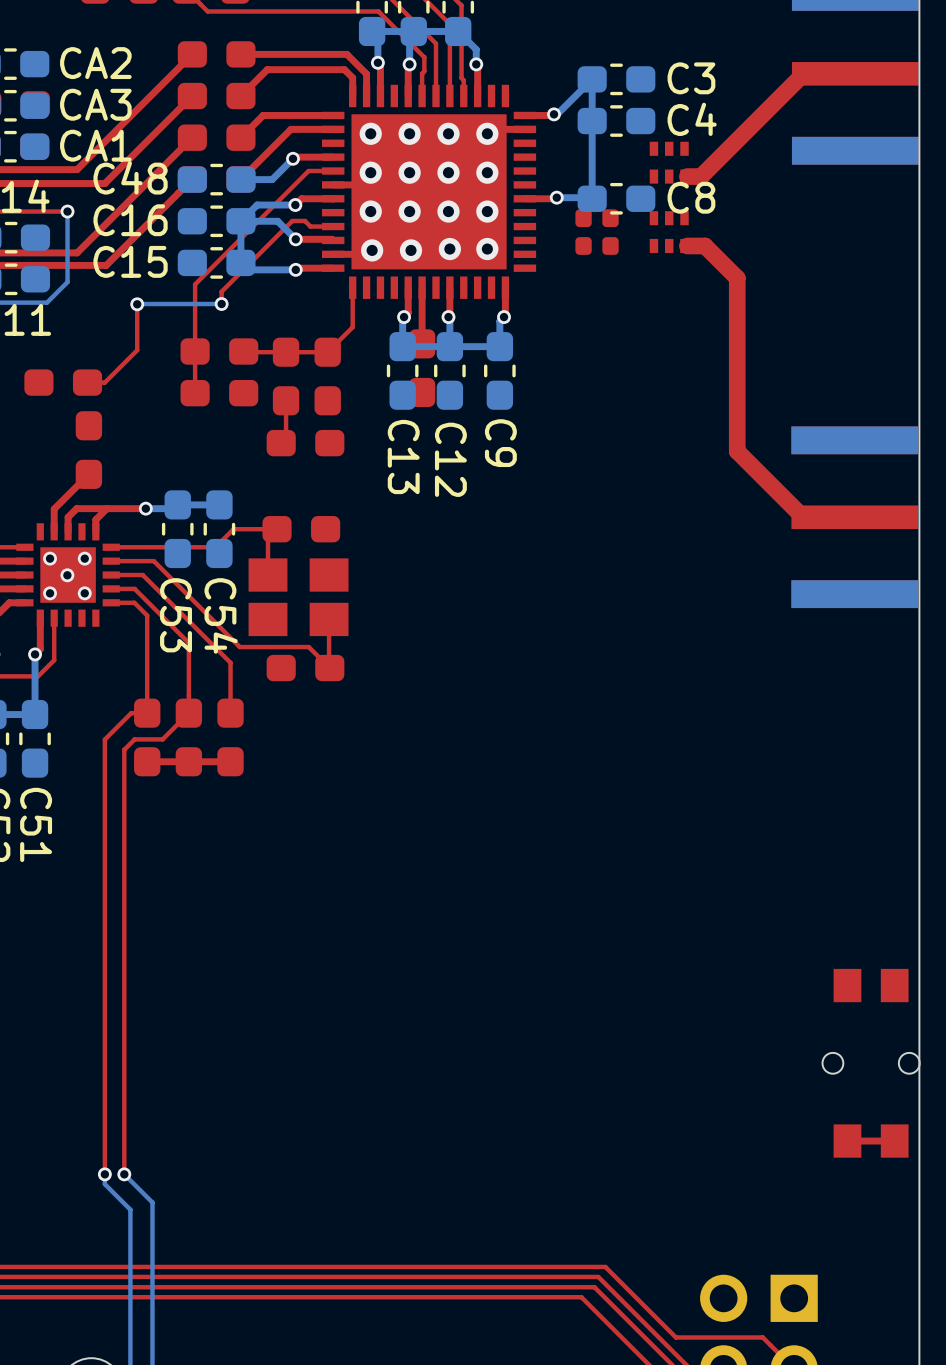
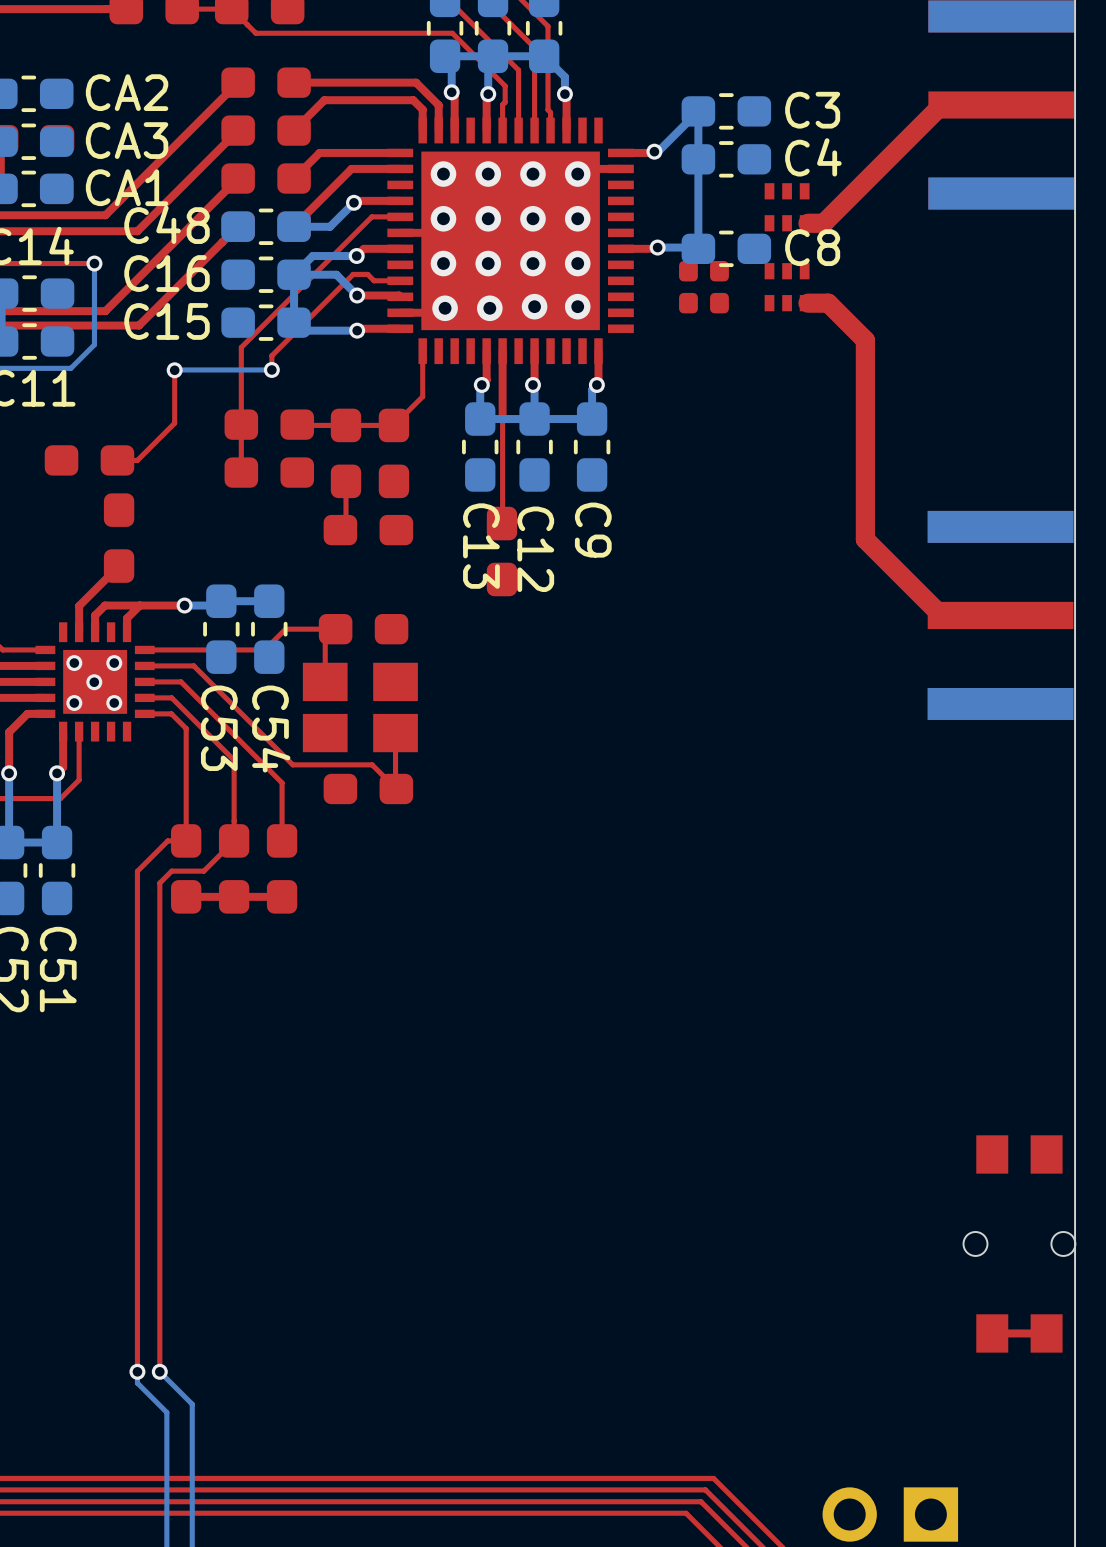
top track: none -> (502, 415) (501, 523)
part position: (422, 368) -> (501, 551)

